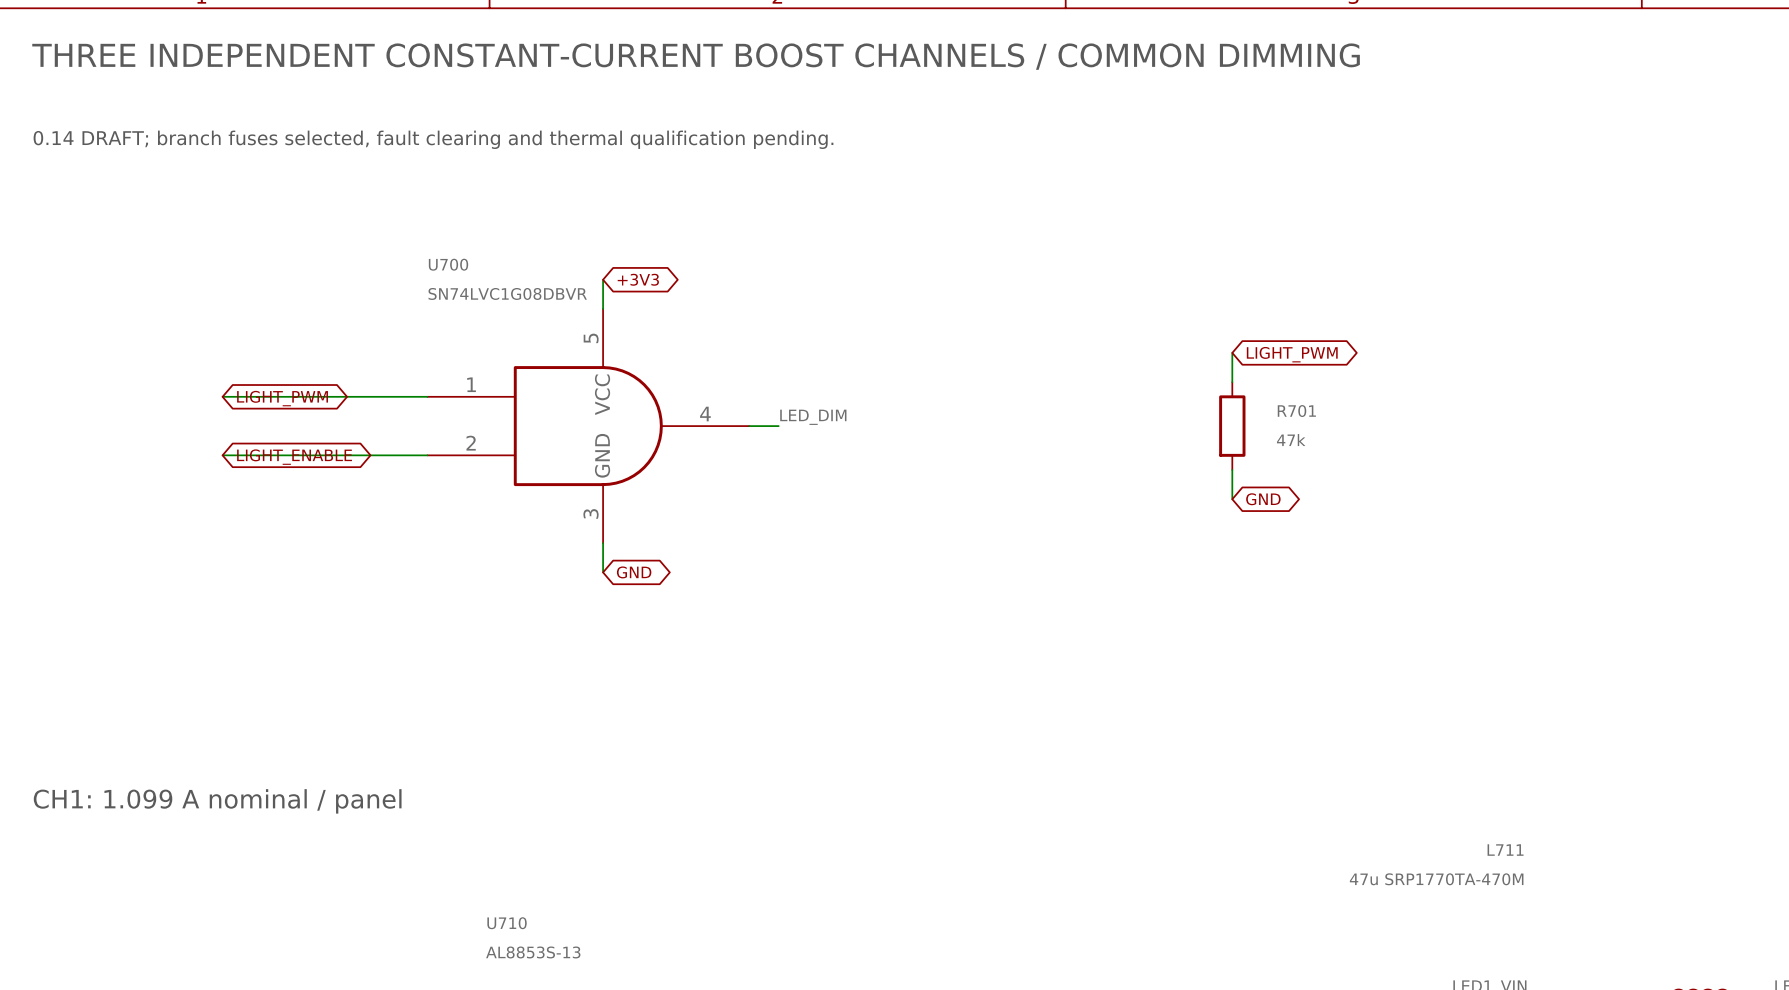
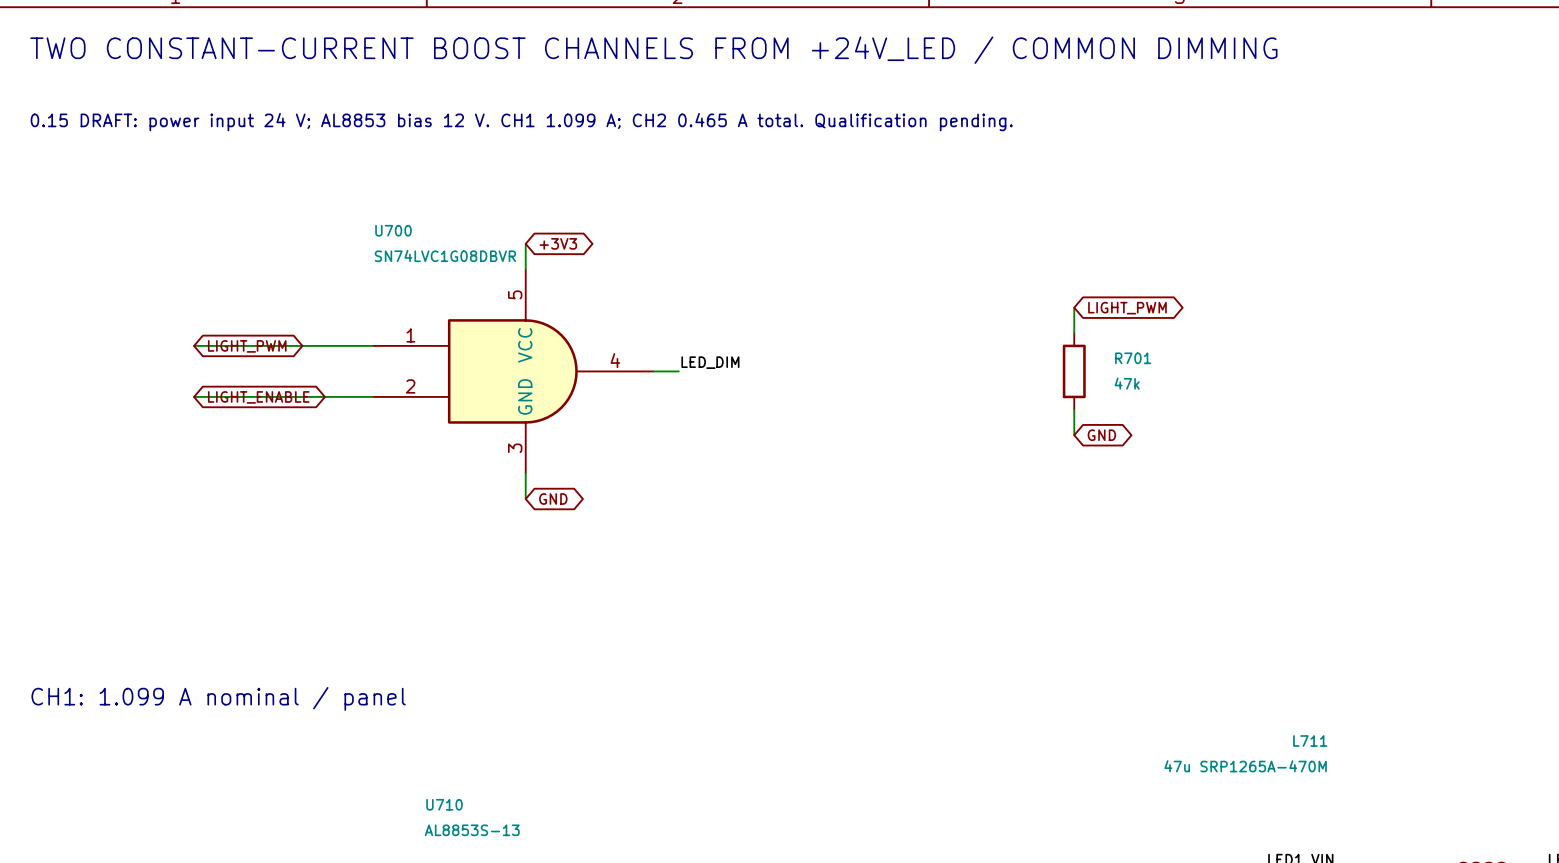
text: THREE INDEPENDENT CONSTANT-CURRENT BOOST CHANNELS / COMMON DIMMING (696, 56) -> TWO CONSTANT-CURRENT BOOST CHANNELS FROM +24V_LED / COMMON DIMMING (653, 50)
text: 0.14 DRAFT; branch fuses selected, fault clearing and thermal qualification pending. (433, 139) -> 0.15 DRAFT: power input 24 V; AL8853 bias 12 V. CH1 1.099 A; CH2 0.465 A total. Qualification pending. (521, 122)
L711 value: 47u SRP1770TA-470M (1436, 879) -> 47u SRP1265A-470M (1245, 766)

